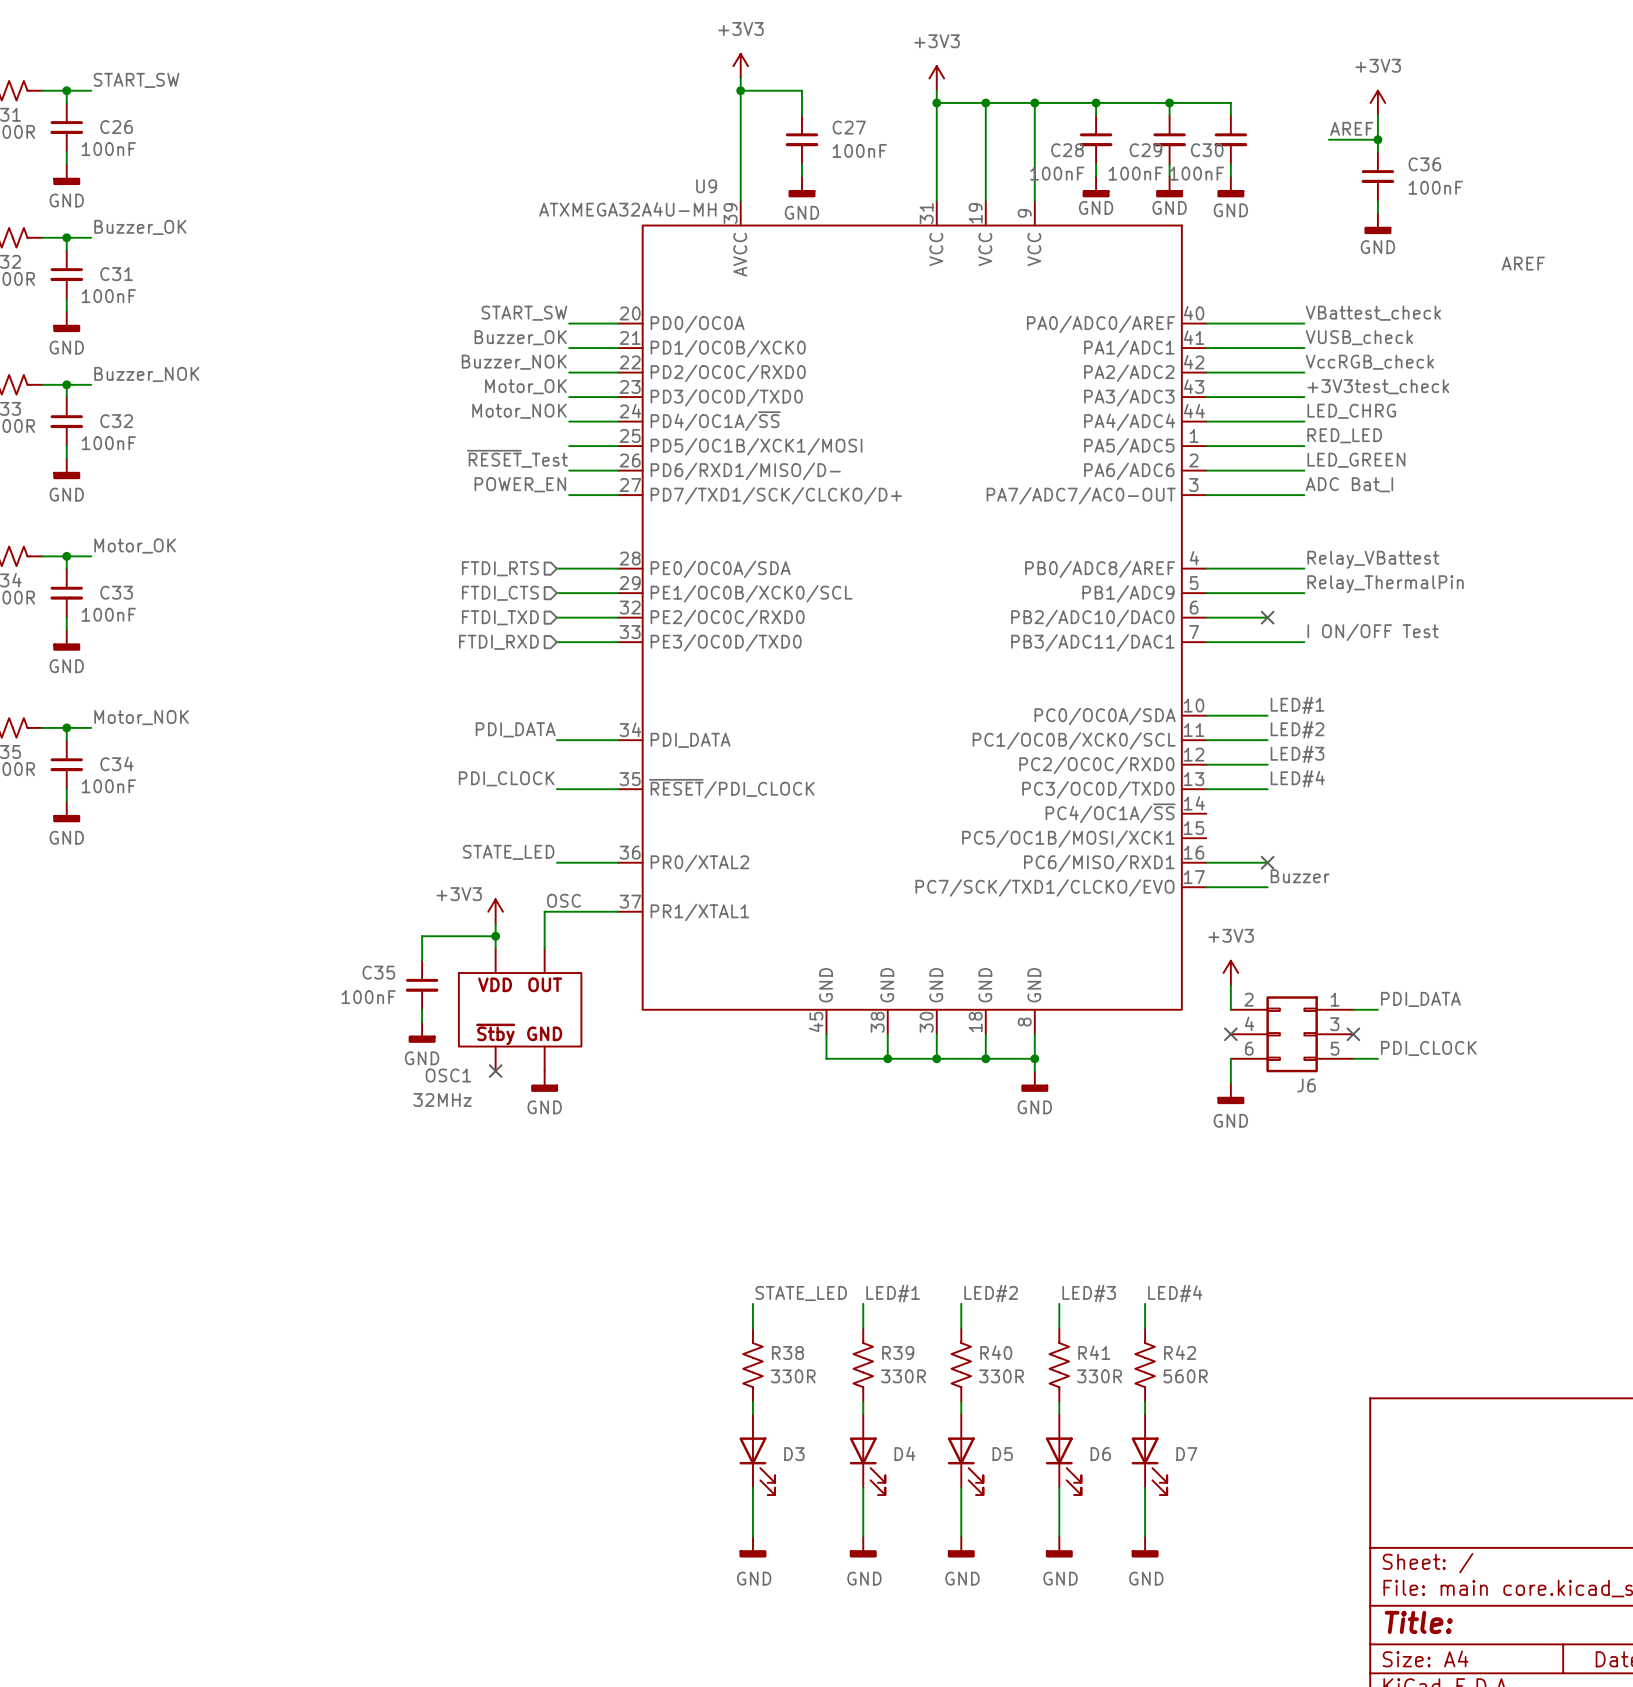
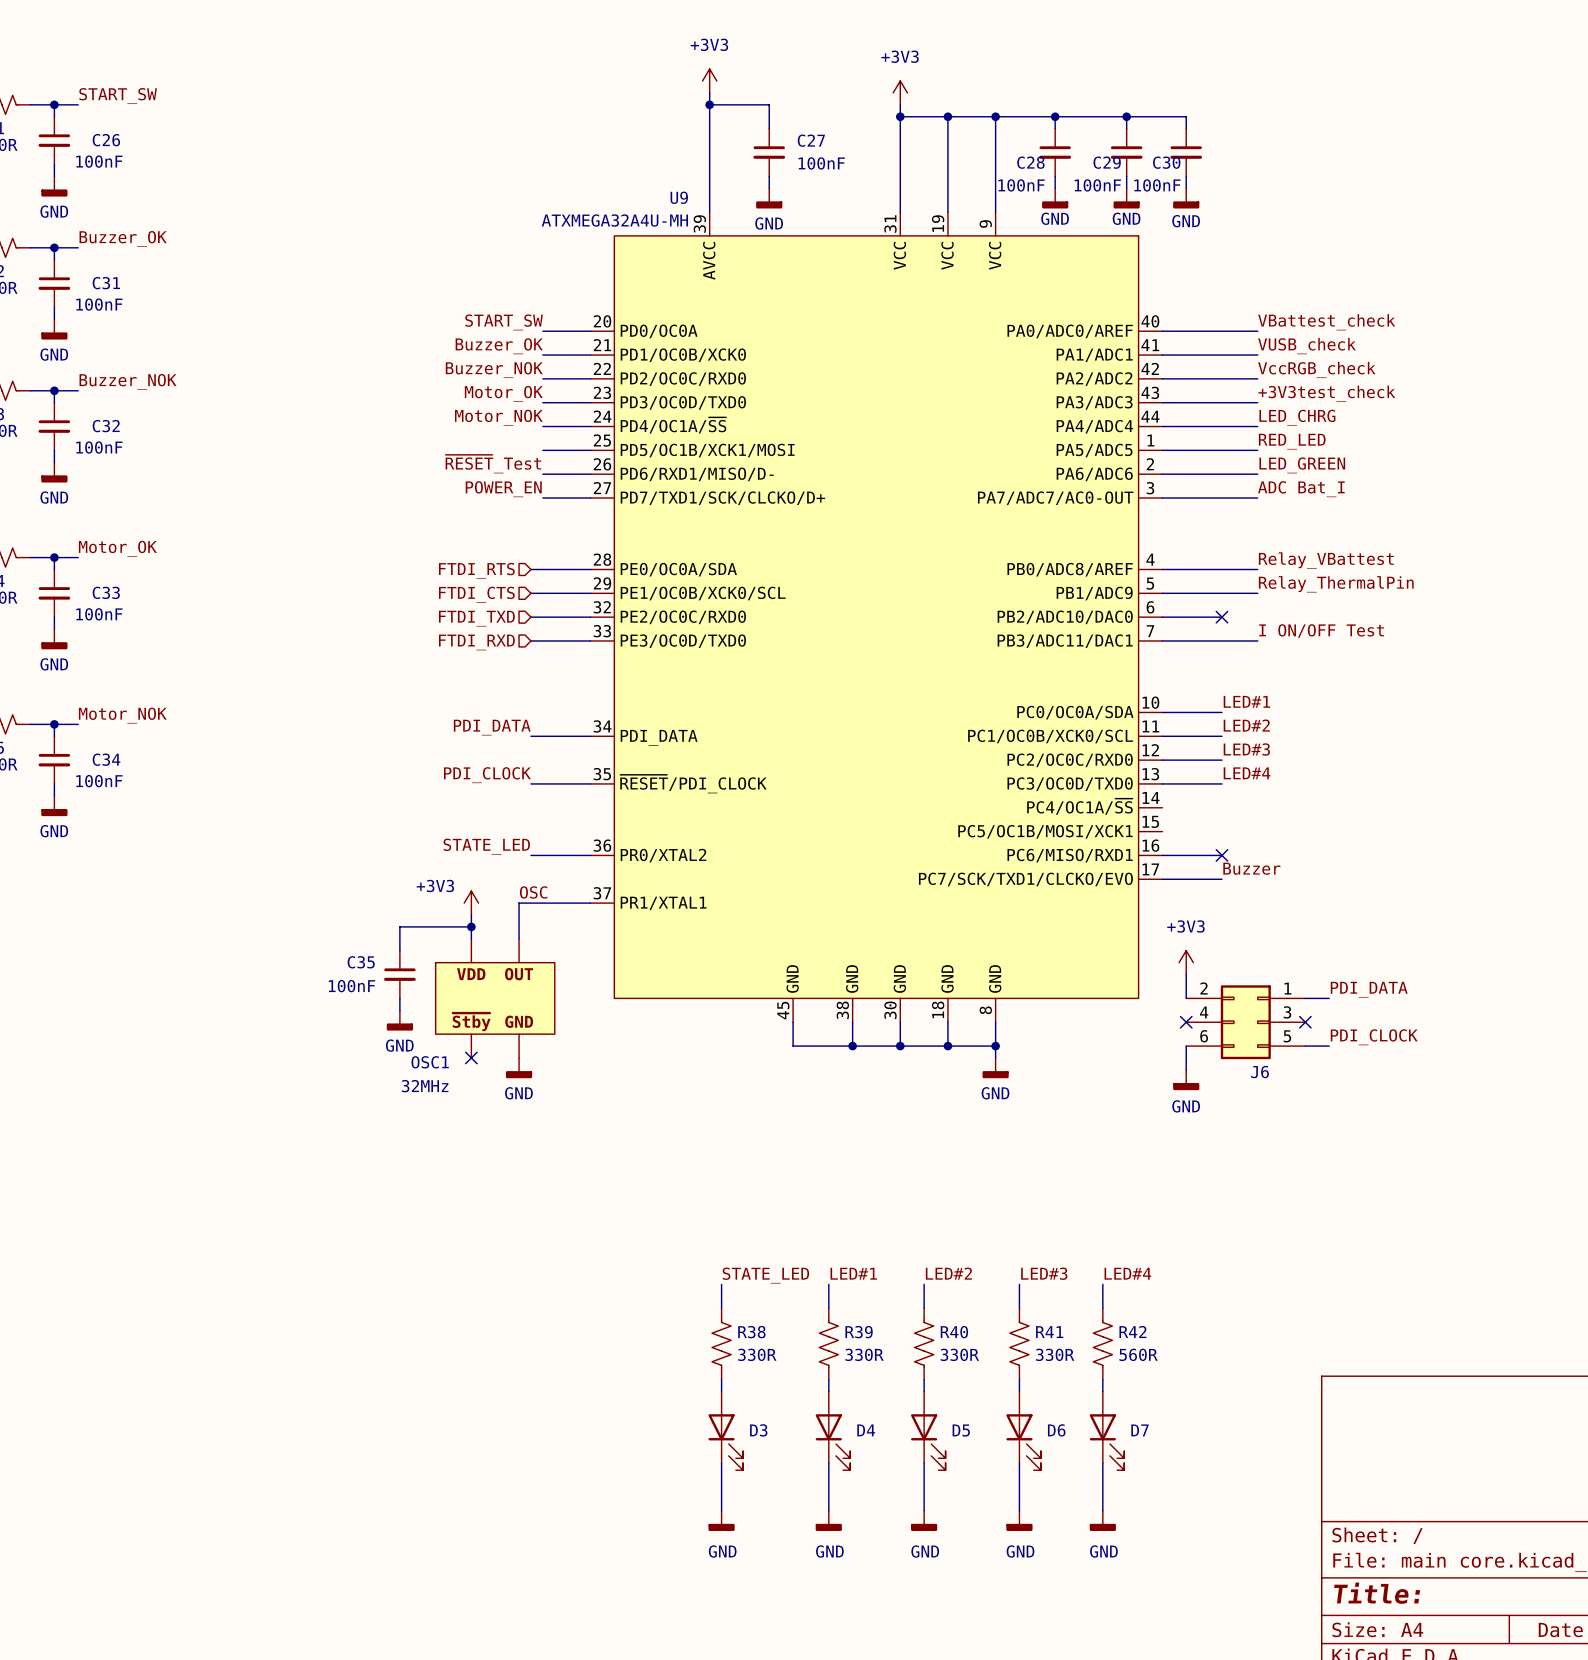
power symbol: +3V3 (1377, 102) -> none
wire: (1377, 115) (1377, 151) -> none
label: AREF (1351, 128) -> none
wire: (1328, 139) (1377, 139) -> none
junction: (1377, 139) -> none
C36: 100nF (1377, 176) -> none
wire: (1377, 201) (1377, 213) -> none
power symbol: GND (1377, 223) -> none
label: AREF (1523, 263) -> none

